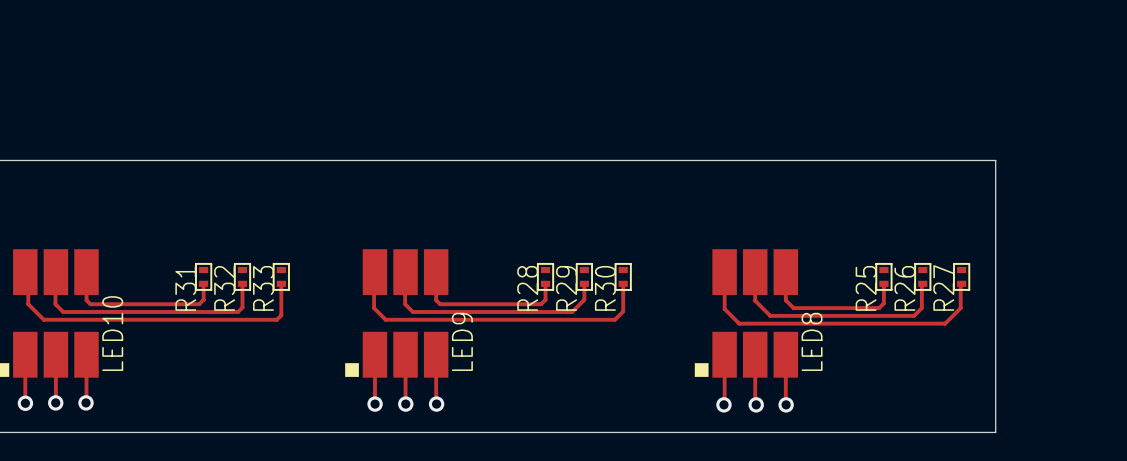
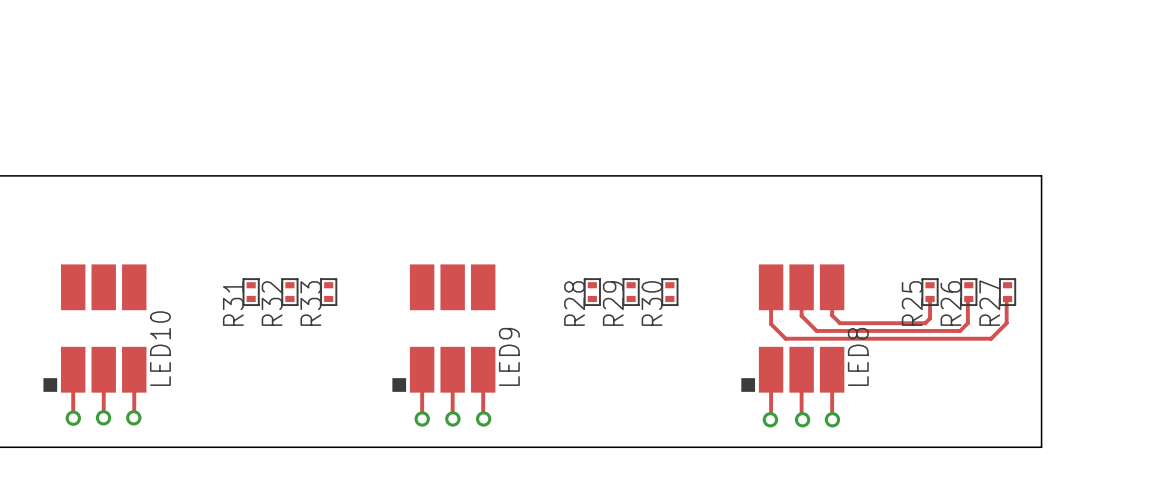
track: (25, 272) (28, 275) (28, 304) (43, 319) (276, 319) (281, 315) (281, 283) -> none
track: (55, 272) (55, 304) (63, 311) (238, 311) (242, 307) (242, 283) -> none
track: (86, 272) (86, 300) (90, 304) (199, 304) (203, 299) (203, 283) -> none
track: (374, 272) (374, 308) (385, 319) (614, 319) (623, 311) (623, 283) -> none
track: (405, 272) (405, 304) (412, 311) (572, 311) (584, 299) (584, 283) -> none
track: (436, 272) (436, 300) (440, 304) (541, 304) (545, 299) (545, 283) -> none

